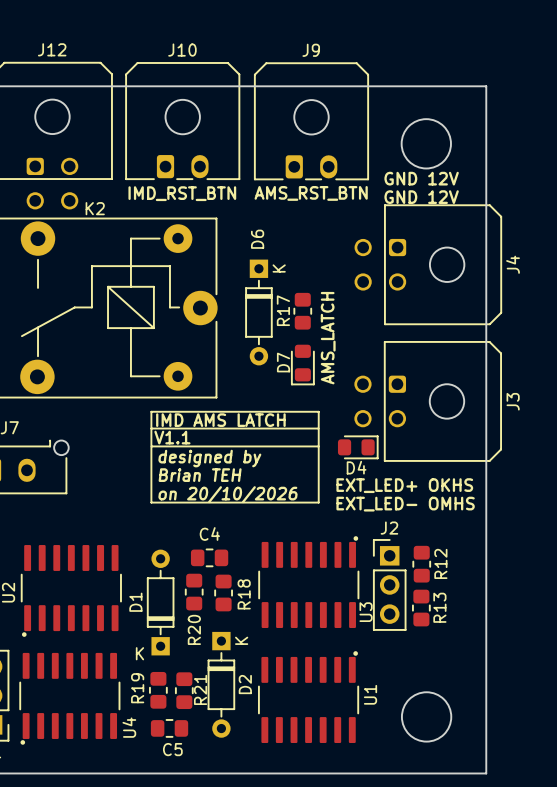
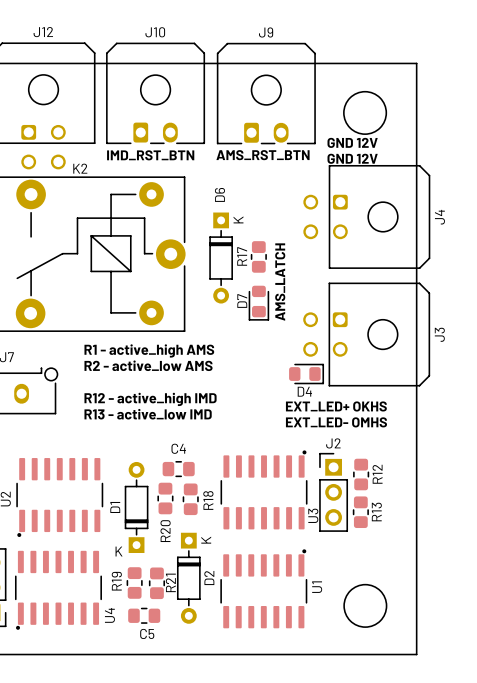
line: (151, 411) (318, 411) (318, 502) (151, 502) (151, 411) -> none
text: IMD AMS LATCH (220, 420) -> none
text: none -> R1 - active_high AMS (149, 350)
line: (151, 428) (318, 428) -> none
text: V1.1 (172, 437) -> none
text: none -> R2 - active_low AMS (148, 365)
line: (151, 446) (318, 446) -> none
text: designed by (209, 458) -> none
text: Brian TEH (200, 475) -> none
text: none -> R12 - active_high IMD (150, 399)
text: none -> R13 - active_low IMD (148, 414)
text: on 20/10/2026 (227, 494) -> none

